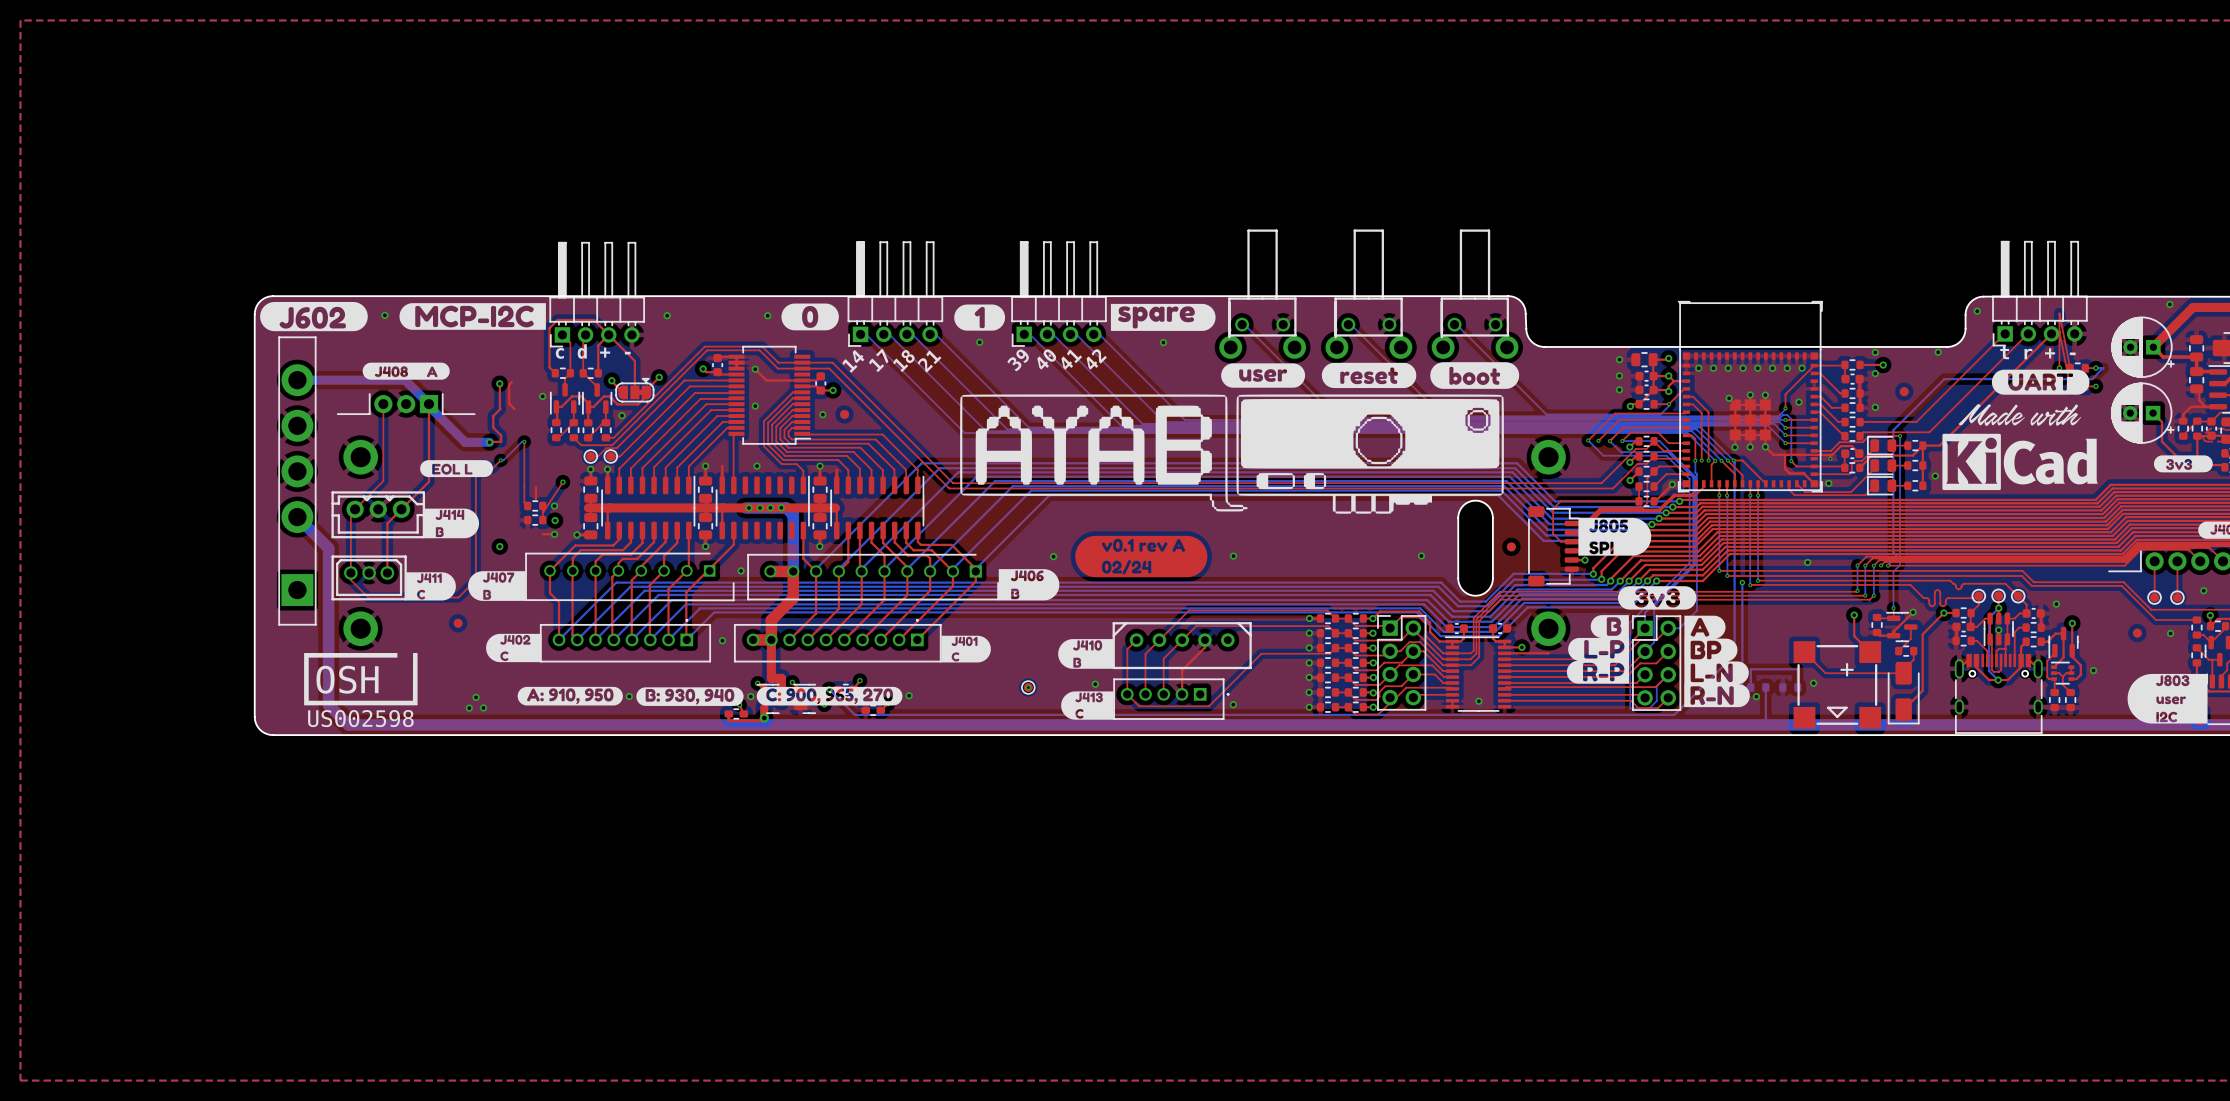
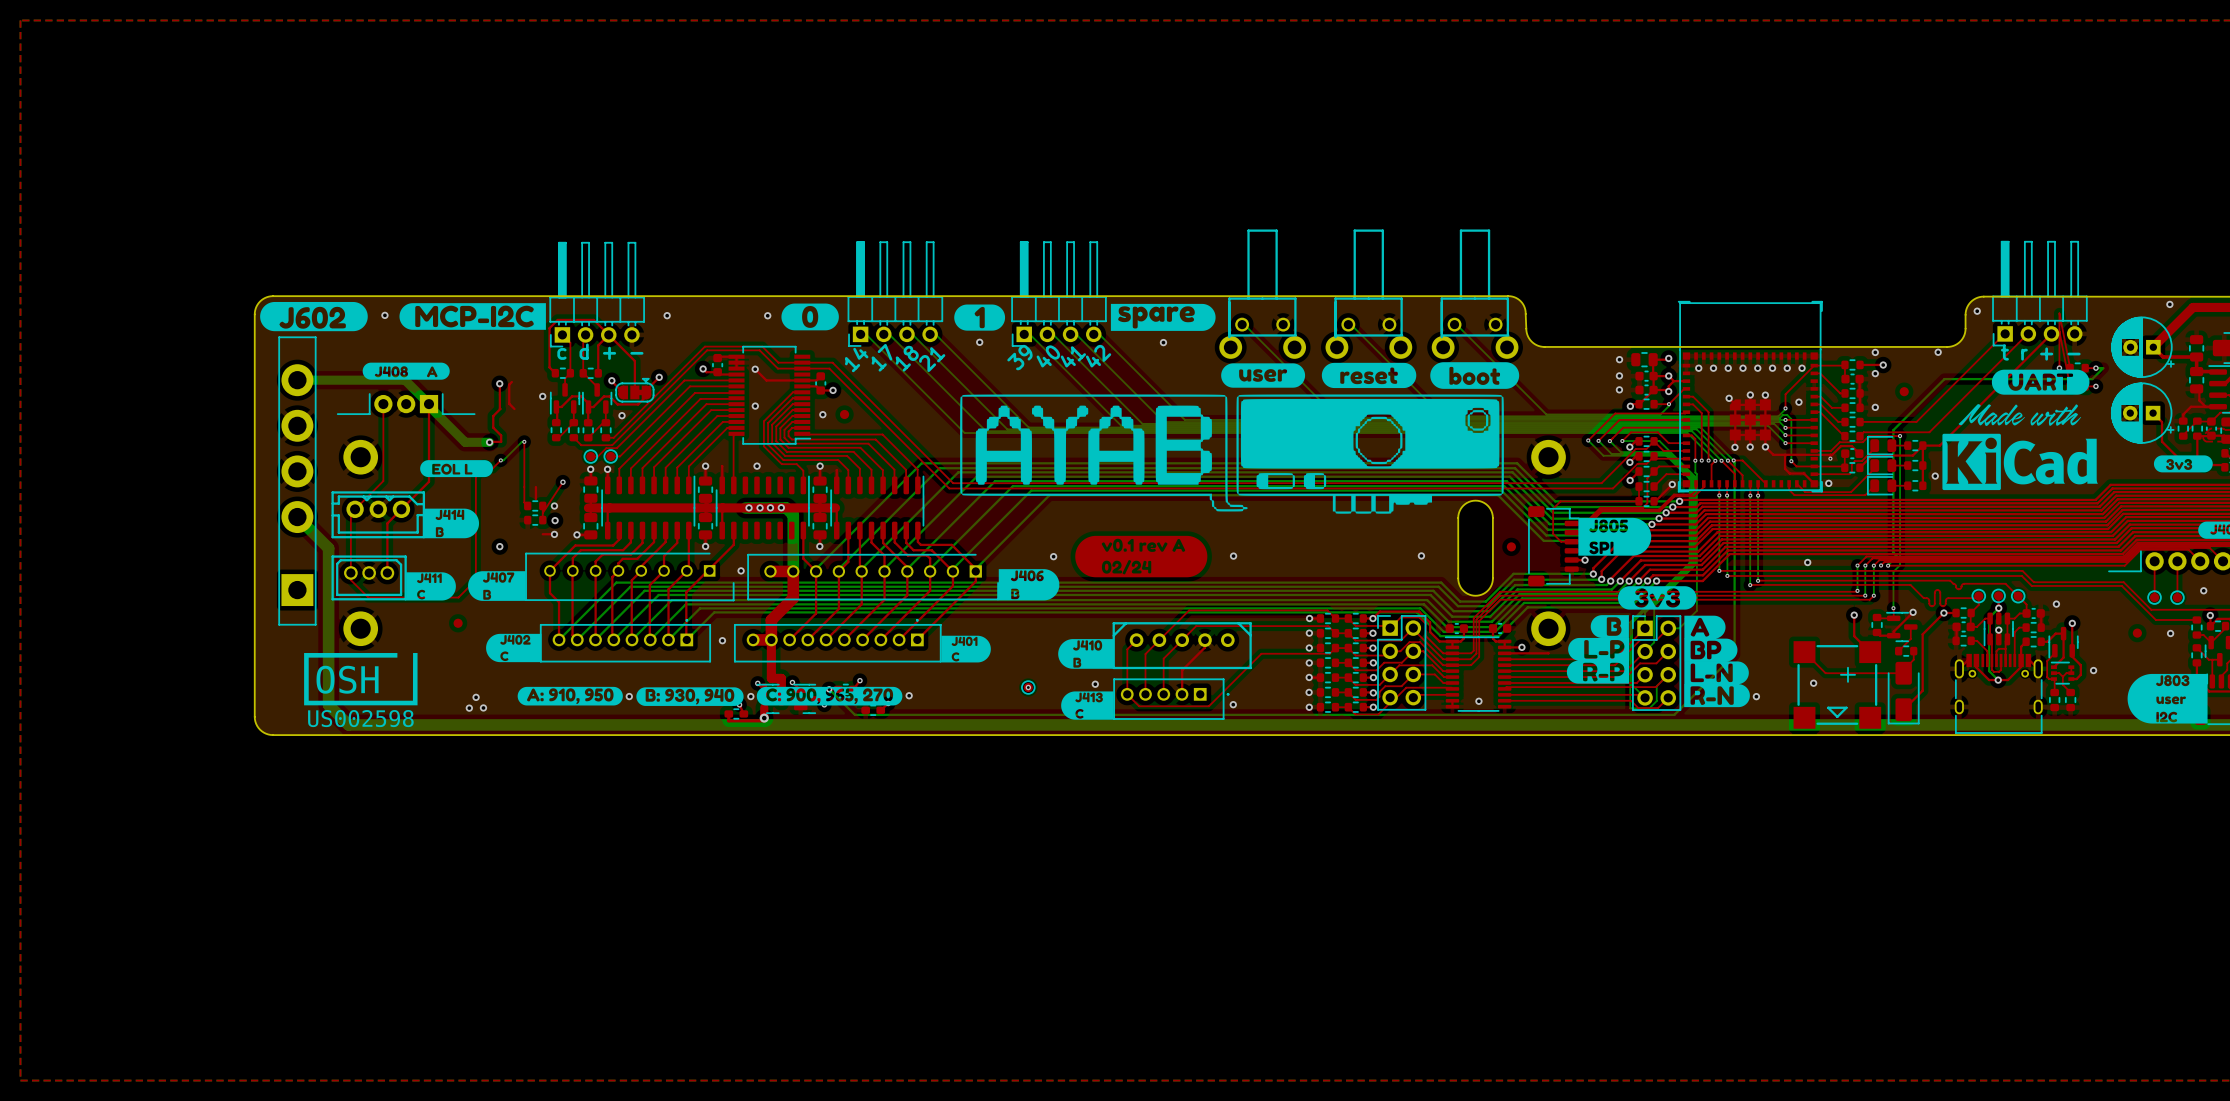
bottom track: none -> (1598, 440) (1611, 453) (1667, 453) (1691, 478) (1691, 563) (1632, 623) (1632, 684) (1645, 697)
bottom track: (1742, 582) (1742, 687) (1750, 687) (1750, 669) (1797, 669) (1797, 687) -> none
via: (1742, 582) -> none
part: (1758, 687) -> none
bottom track: (1765, 687) (1765, 724) -> none
part: (1790, 687) -> none

